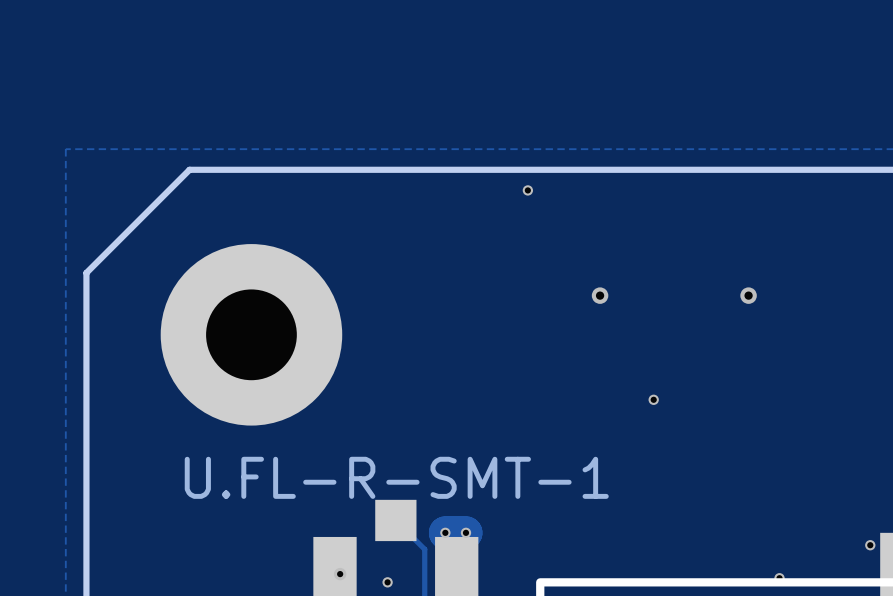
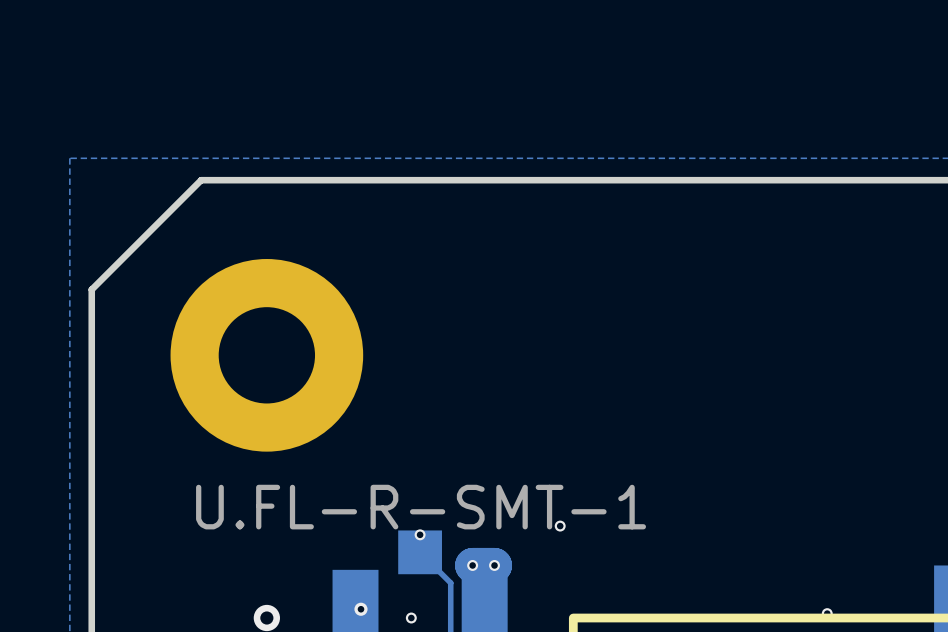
via: (527, 190) -> none
via: (600, 295) -> none
via: (748, 295) -> none
via: (653, 399) -> none
via: none -> (560, 526)
via: none -> (420, 534)
via: (870, 545) -> none
via: none -> (266, 618)

